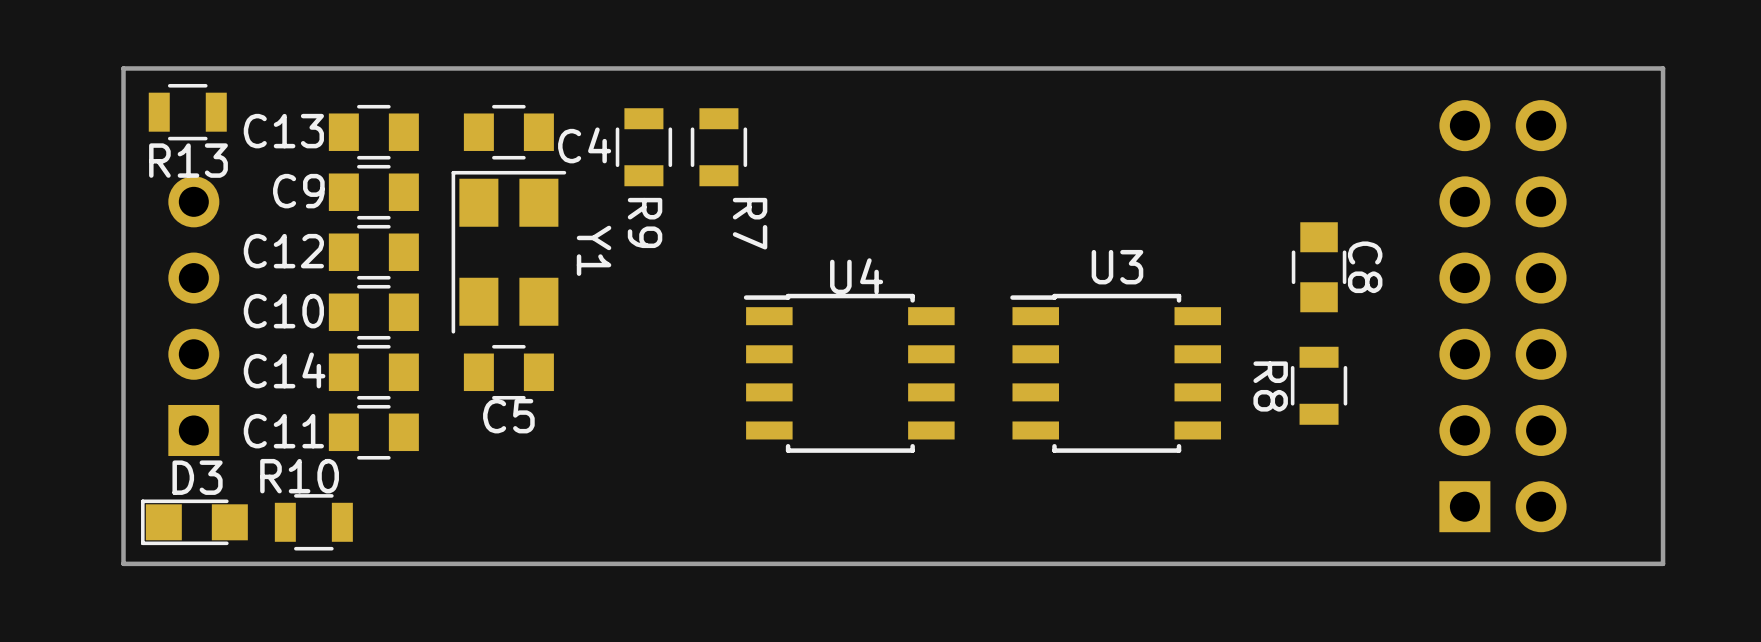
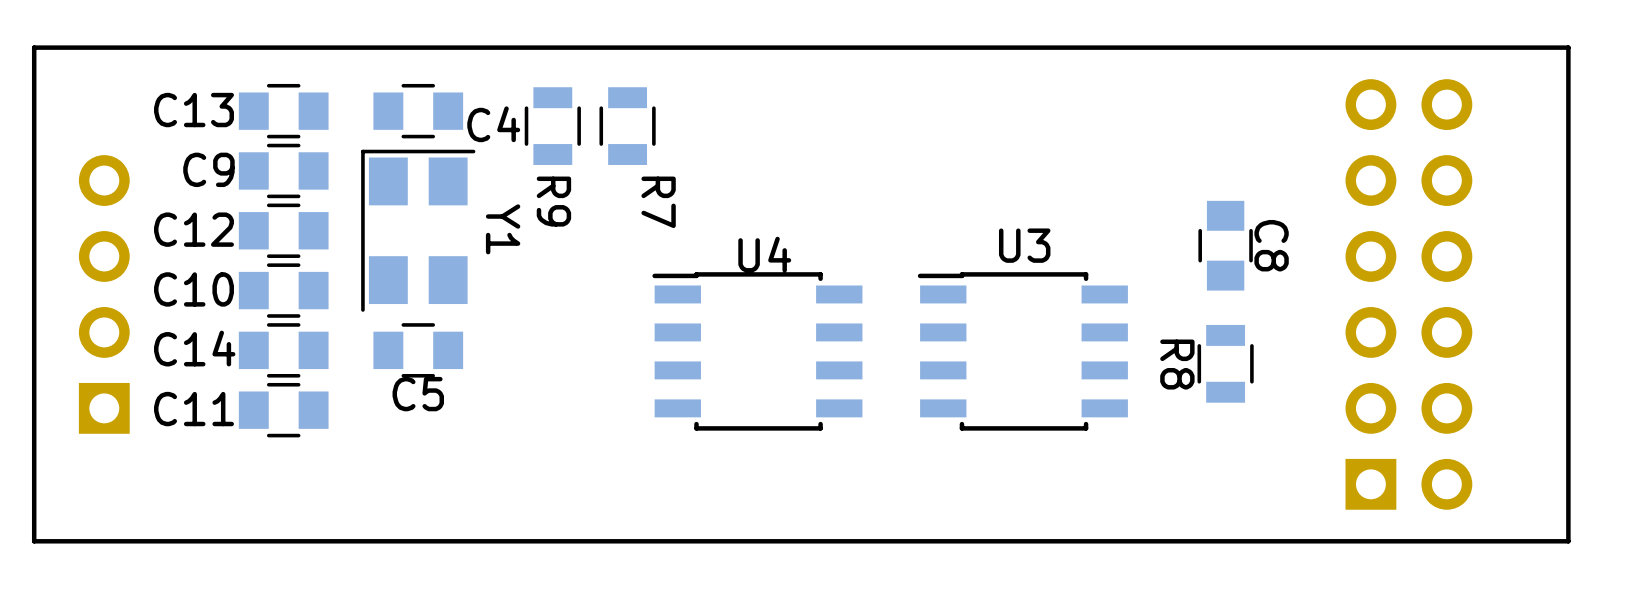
R13: (187, 112) -> none
D3: (194, 522) -> none
R10: (313, 522) -> none

